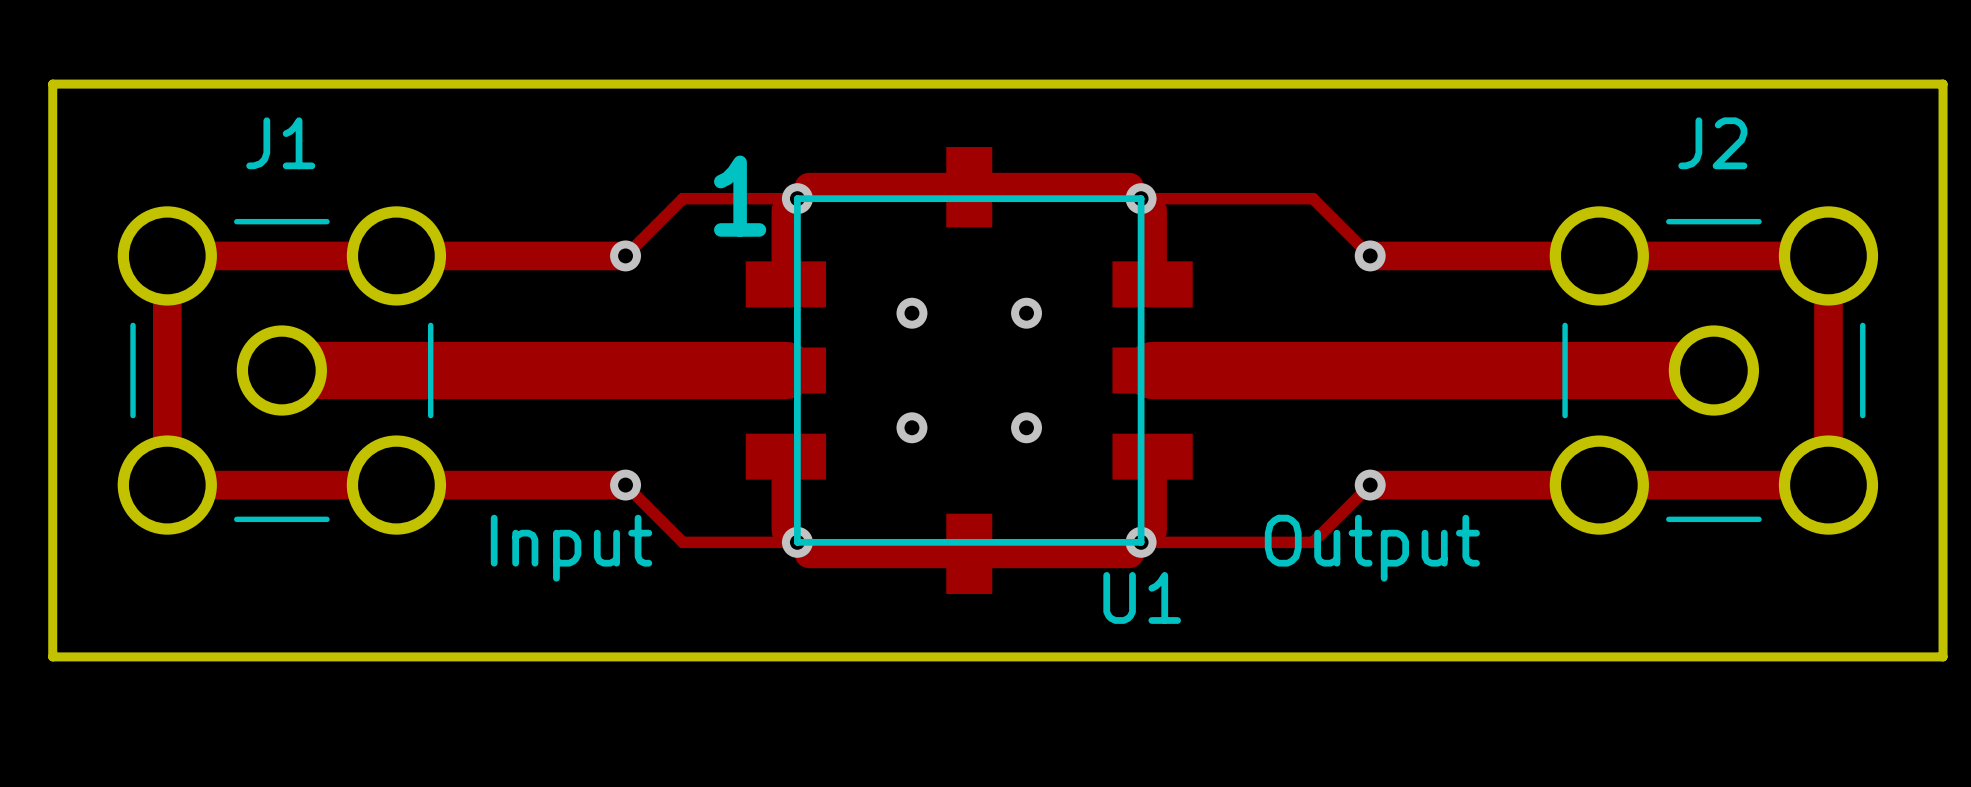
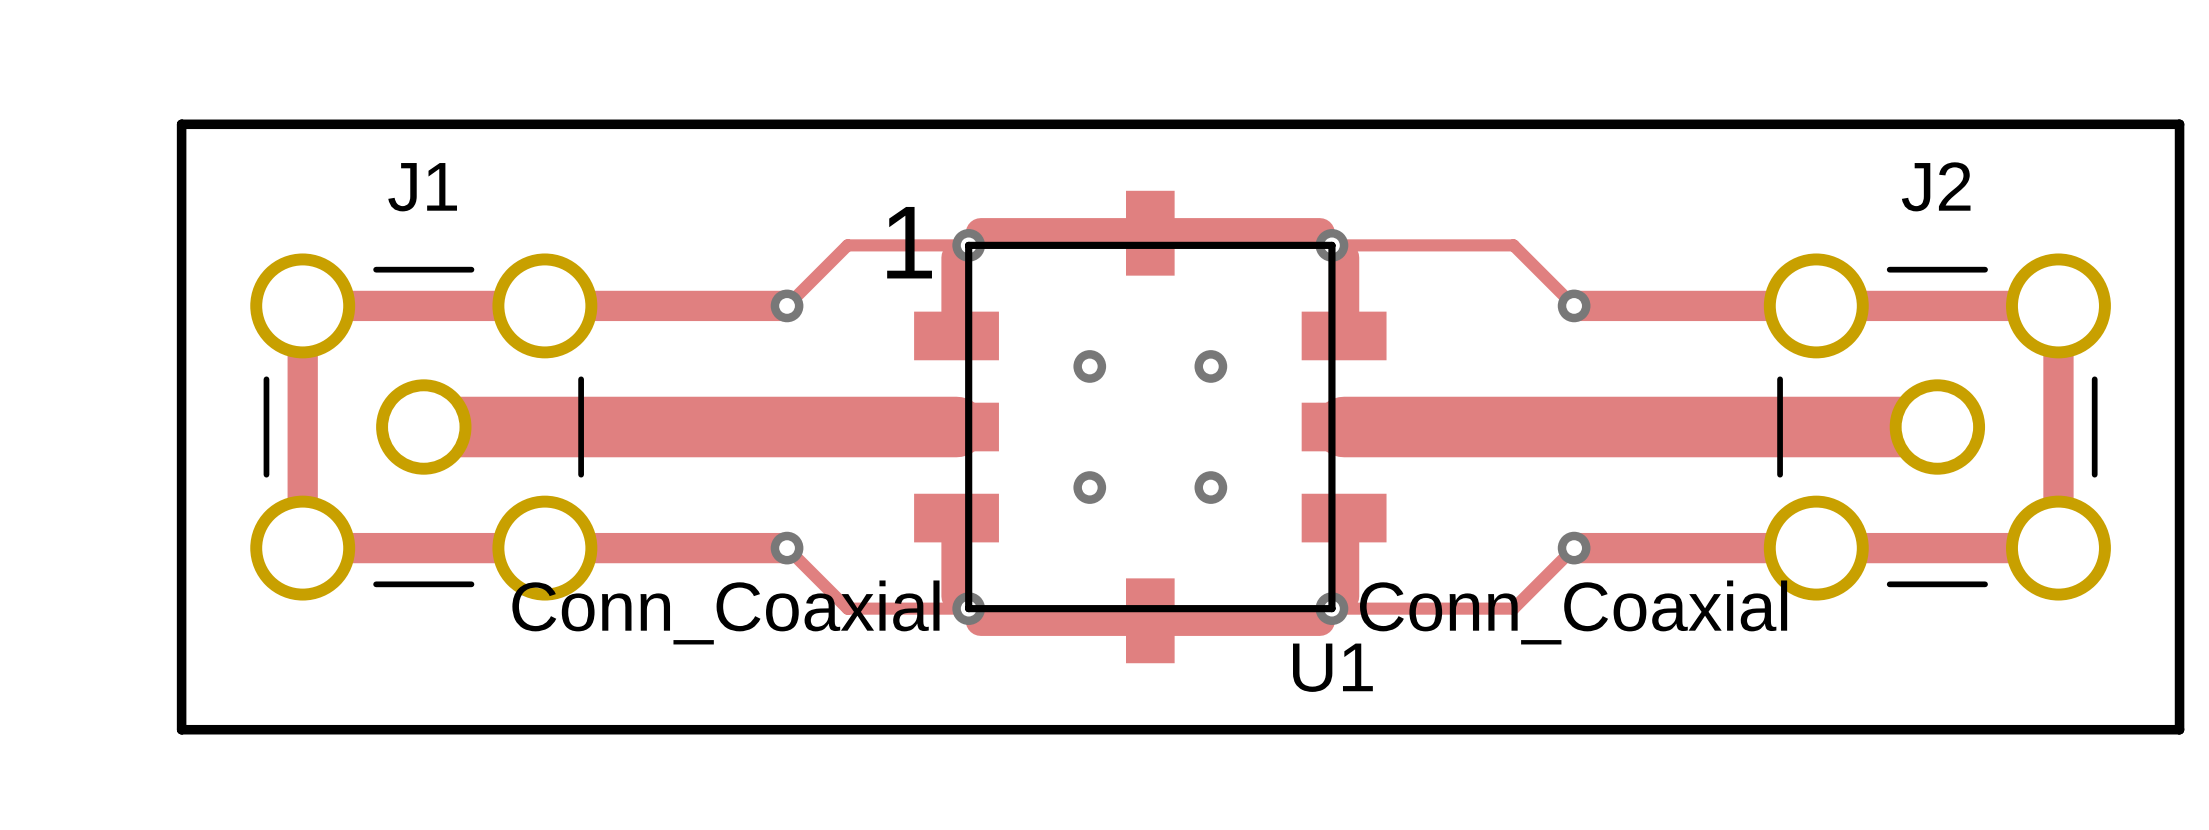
J1 value: Input (571, 548) -> Conn_Coaxial (725, 612)
J2 value: Output (1372, 548) -> Conn_Coaxial (1573, 612)

